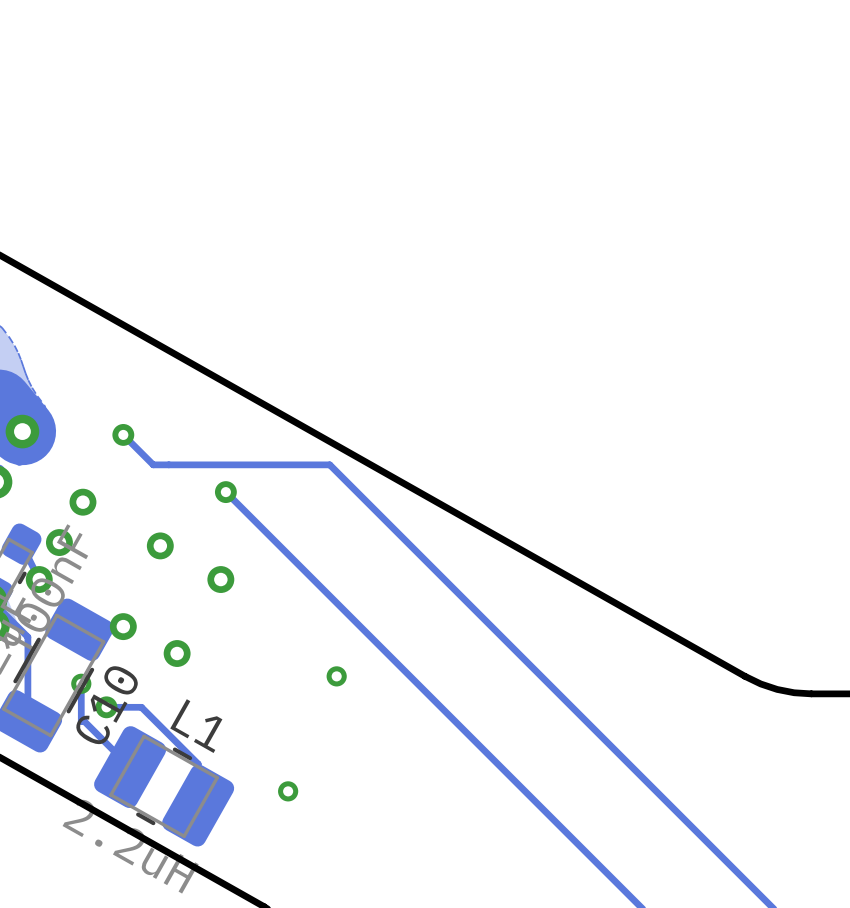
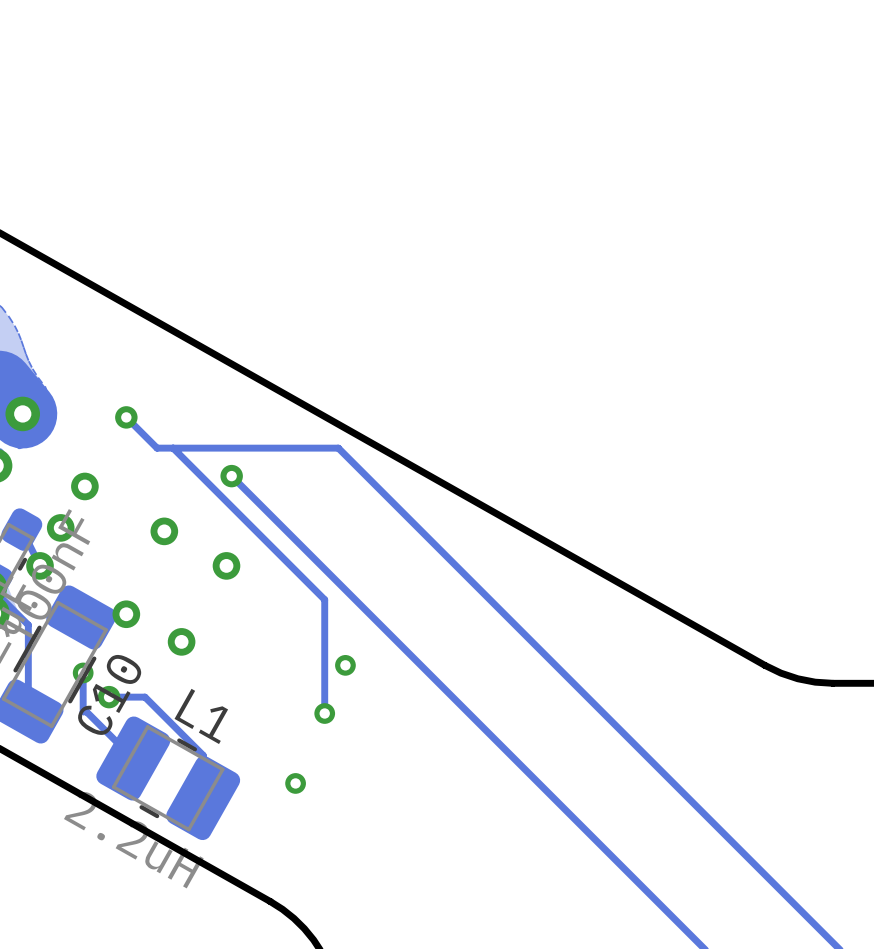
track: none -> (173, 448) (324, 599) (324, 713)
via: none -> (324, 713)

